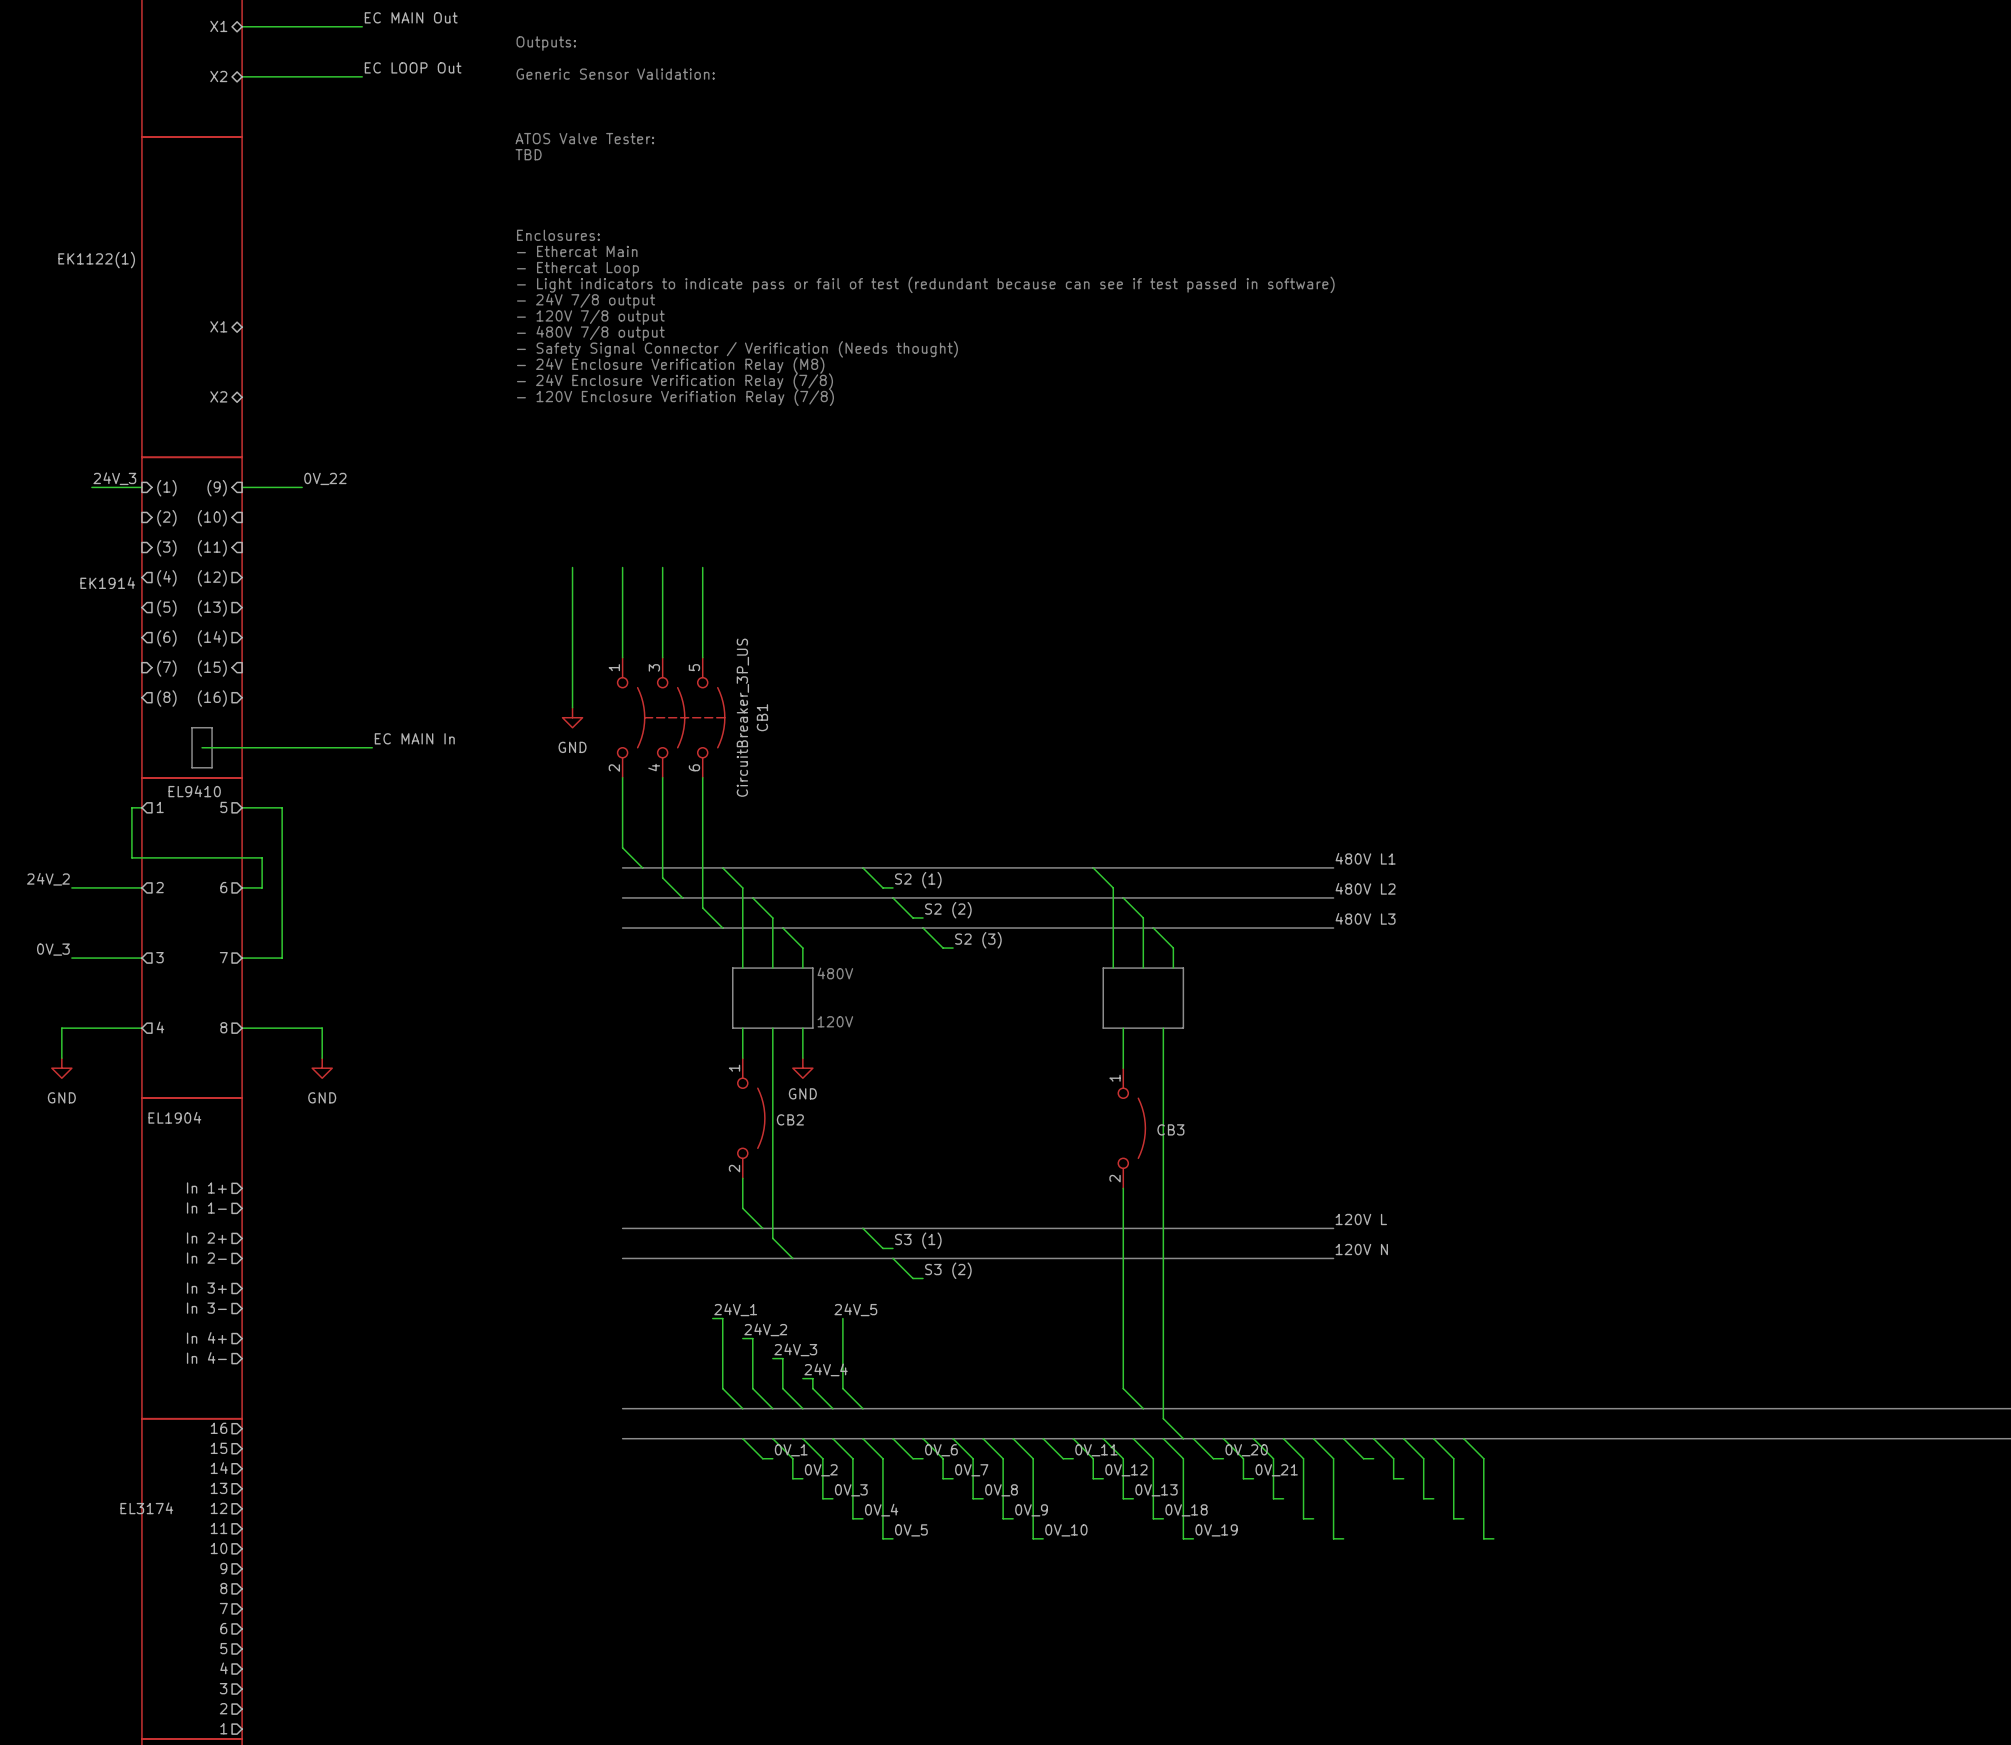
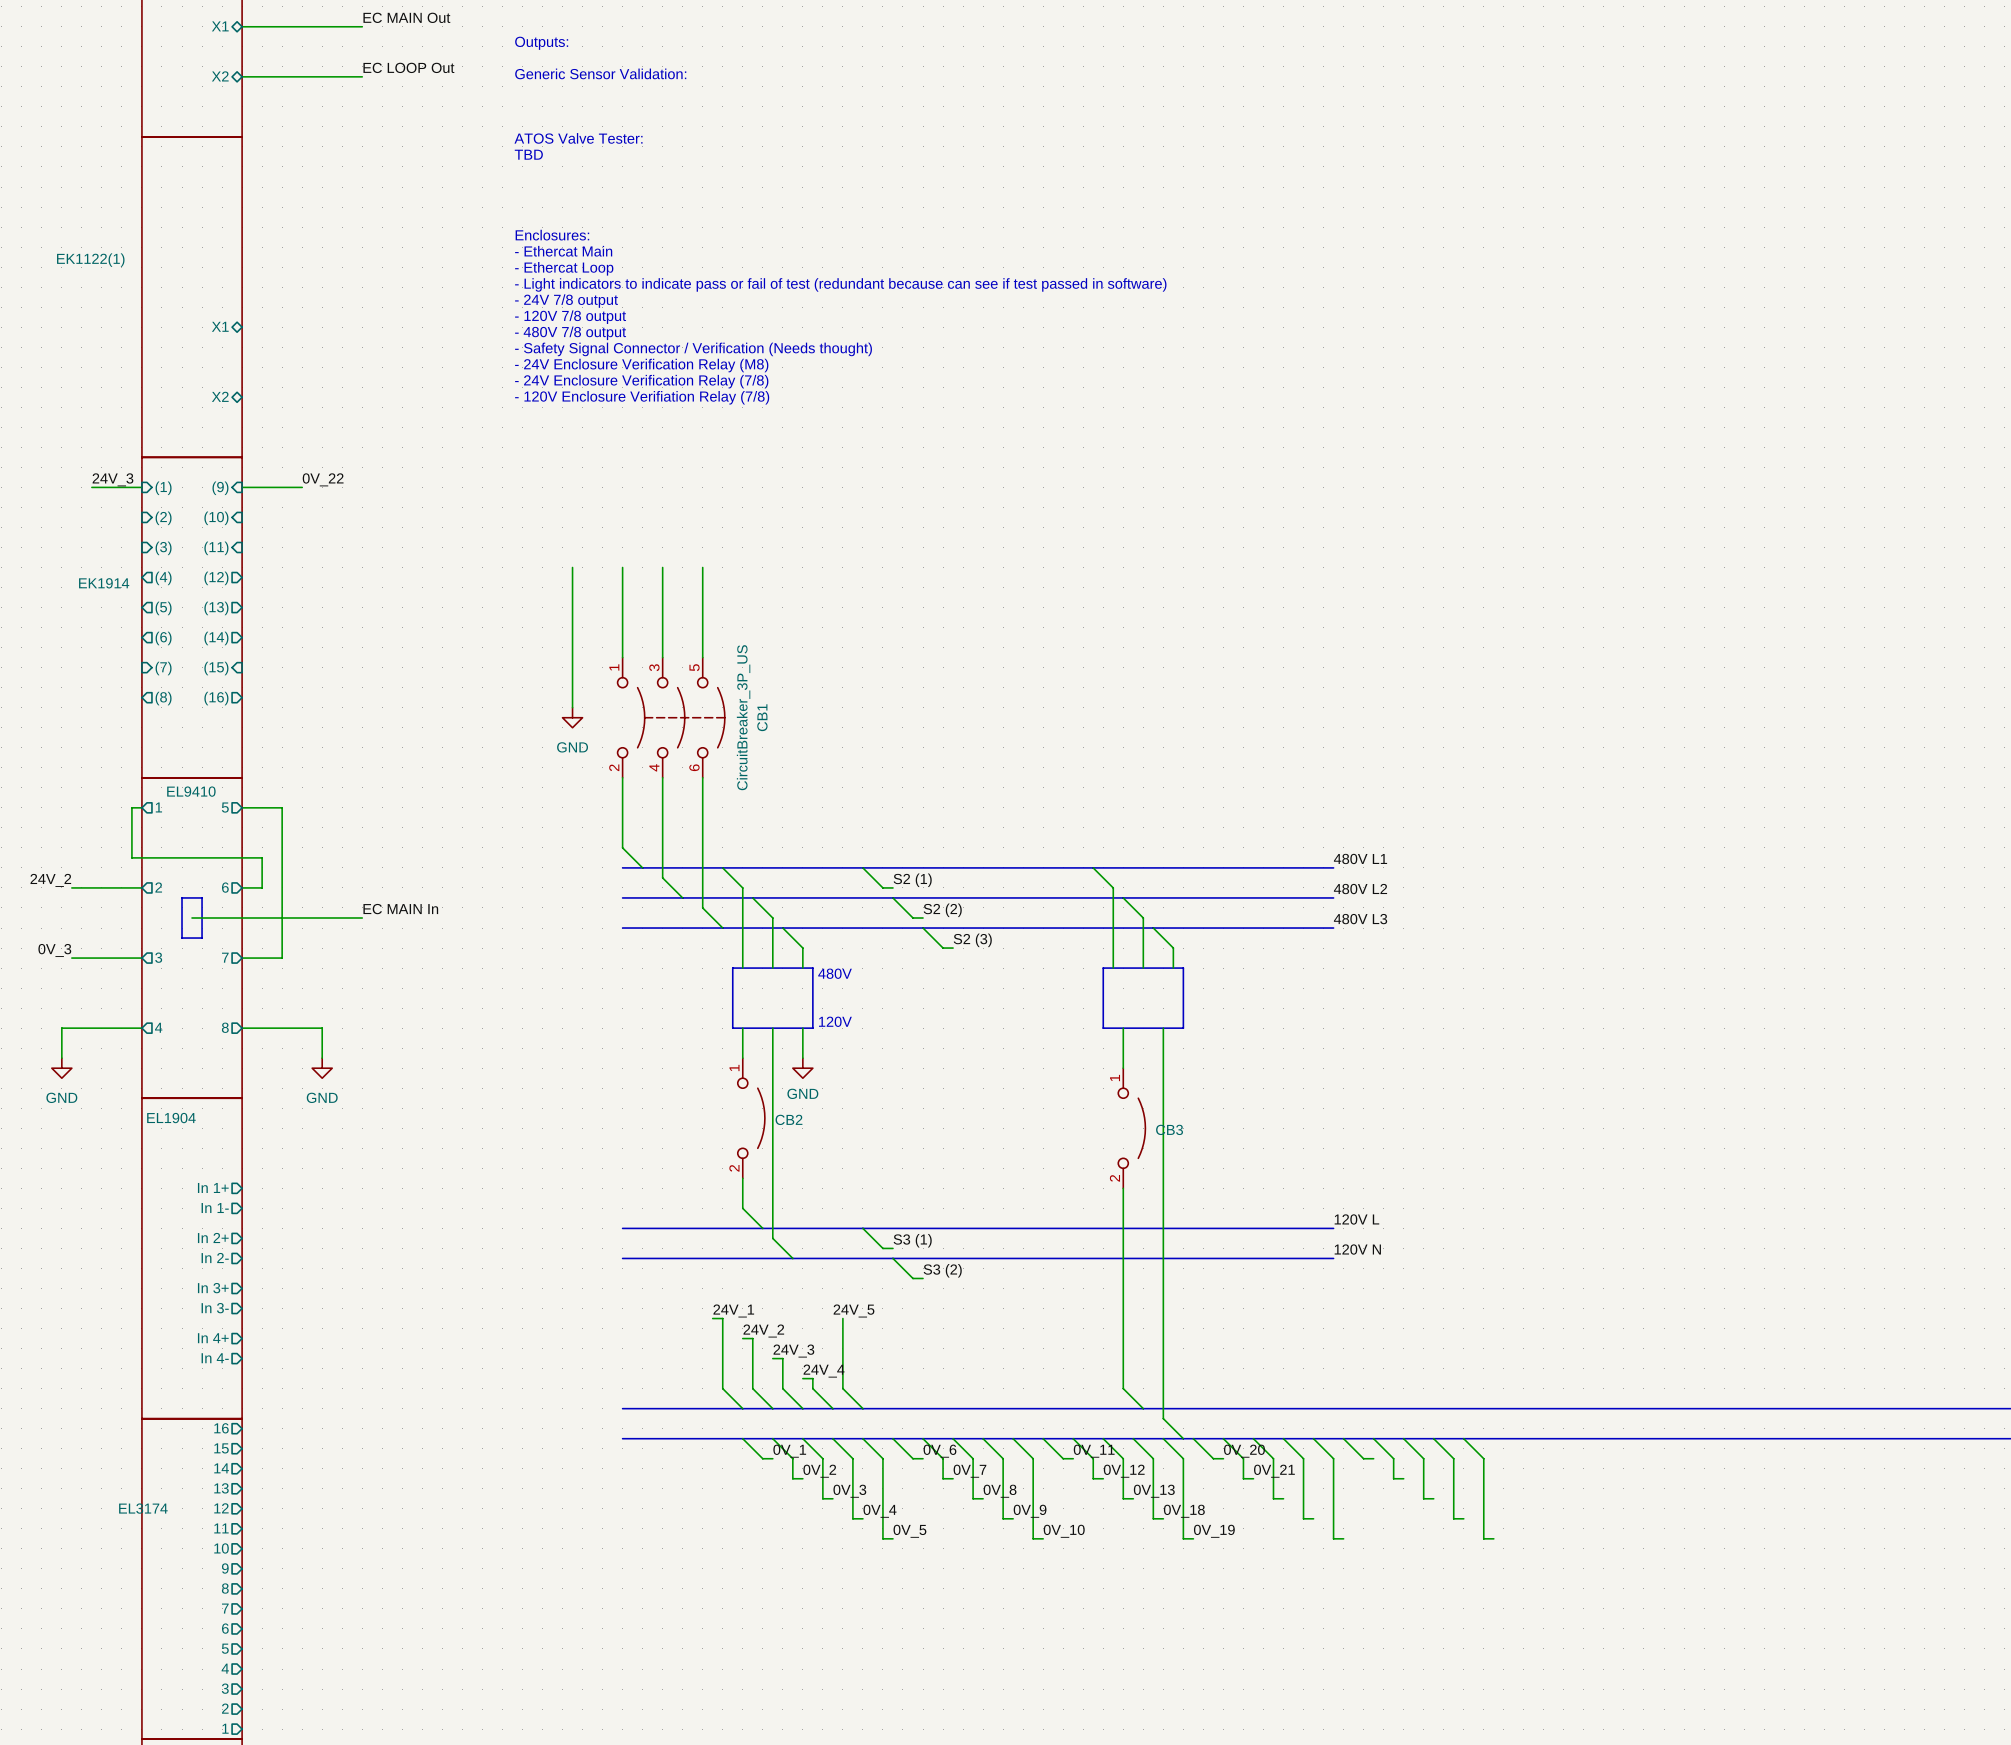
line: (192, 727) (212, 727) (212, 767) (192, 767) (192, 727) -> (182, 897) (202, 897) (202, 938) (182, 938) (182, 897)
label position: EC MAIN In (414, 738) -> EC MAIN In (400, 909)
wire: (202, 747) (372, 747) -> (192, 917) (362, 917)

